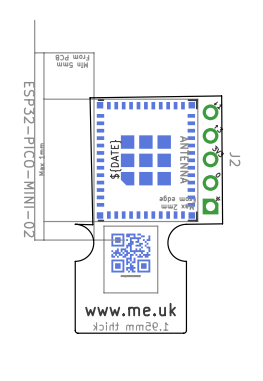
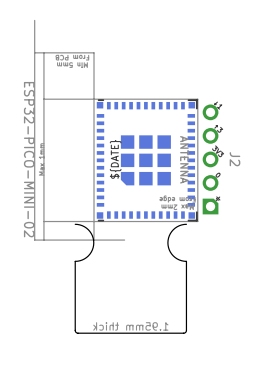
board edge: (186, 224) (222, 223) (221, 95) (90, 97) (92, 224) (75, 224) -> none
part: (130, 259) -> none
text: www.me.uk (130, 309) -> none

